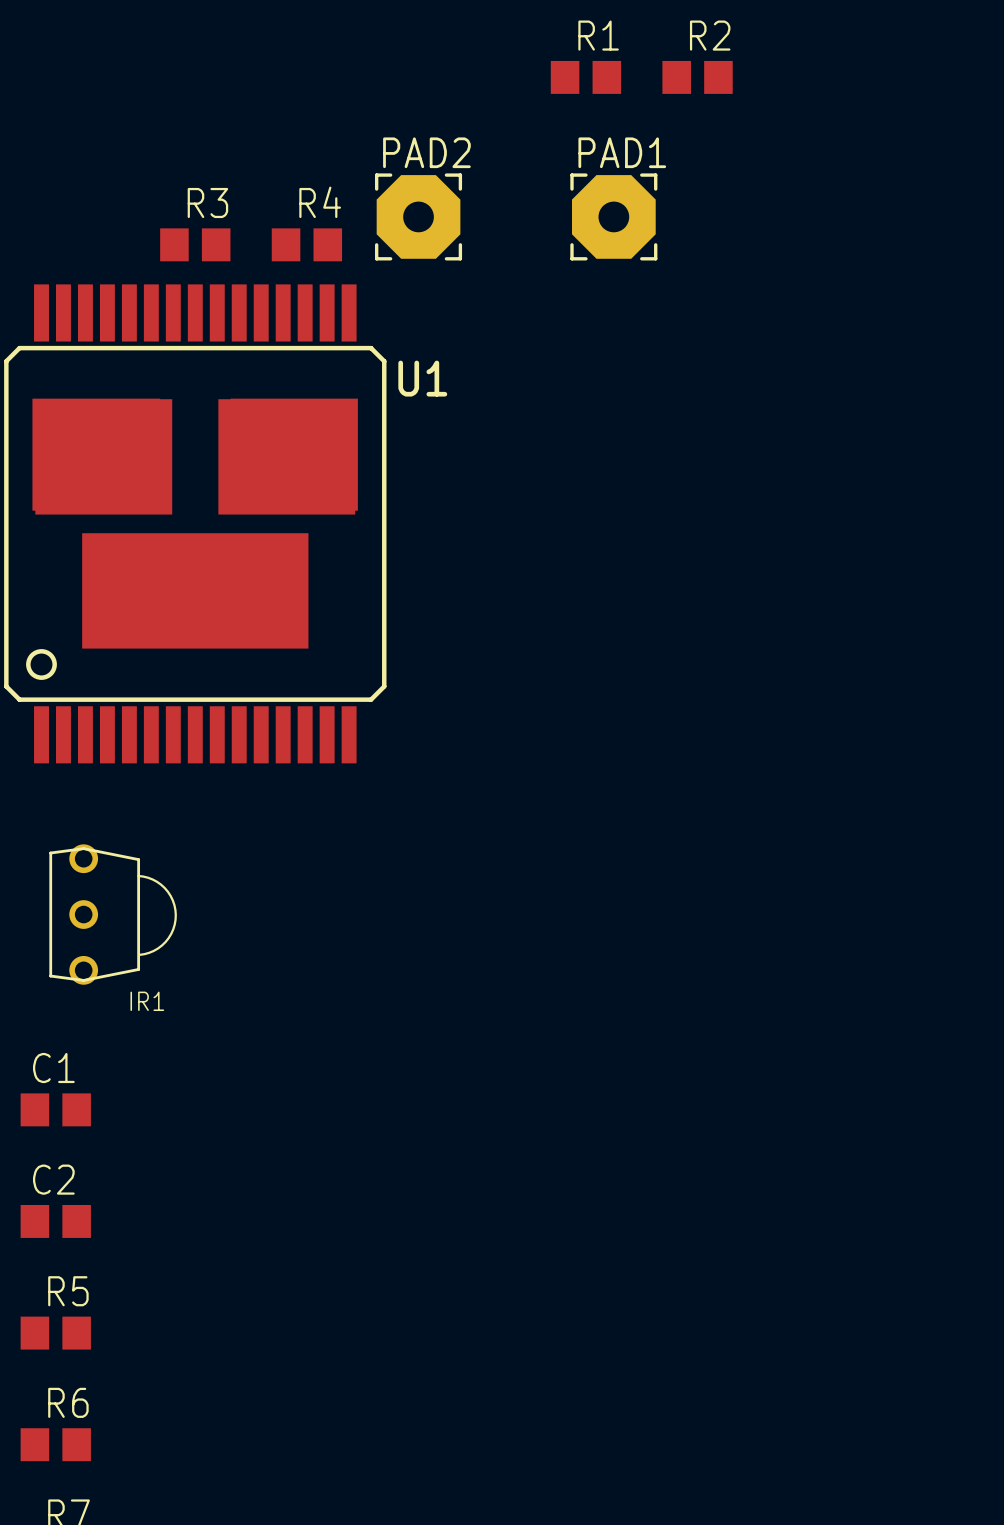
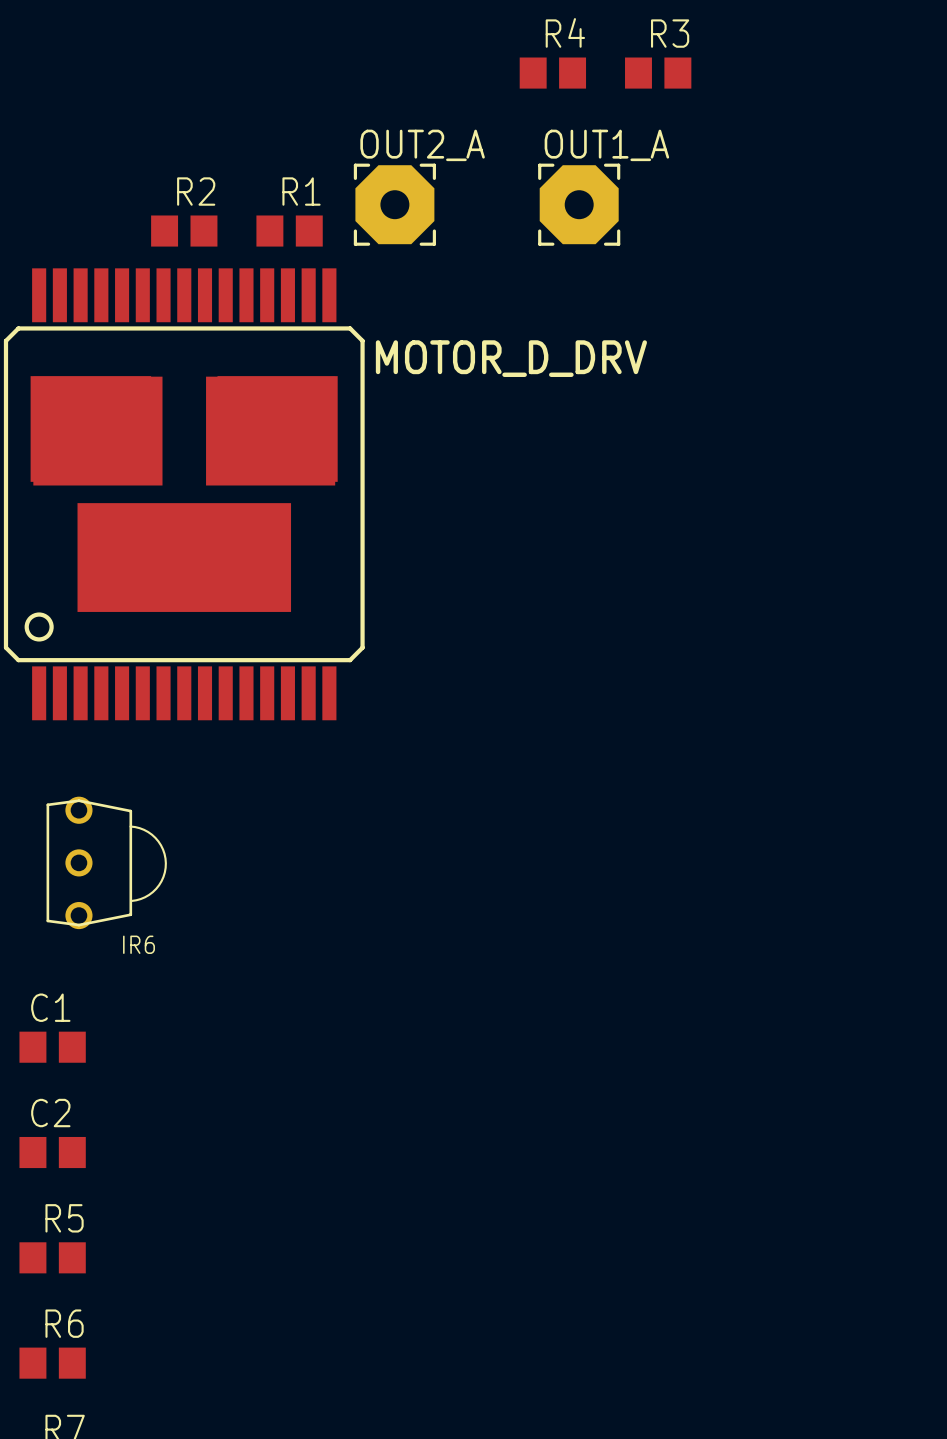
R1 name: R1 (598, 35) -> R4 (565, 32)
R2 name: R2 (710, 35) -> R3 (670, 33)
PAD2 name: PAD2 (426, 152) -> OUT2_A (422, 145)
PAD1 name: PAD1 (622, 152) -> OUT1_A (606, 145)
R3 name: R3 (207, 202) -> R2 (196, 191)
R4 name: R4 (320, 202) -> R1 (301, 191)
U1 name: U1 (422, 378) -> MOTOR_D_DRV (511, 358)
IR1 name: IR1 (147, 1001) -> IR6 (139, 944)

